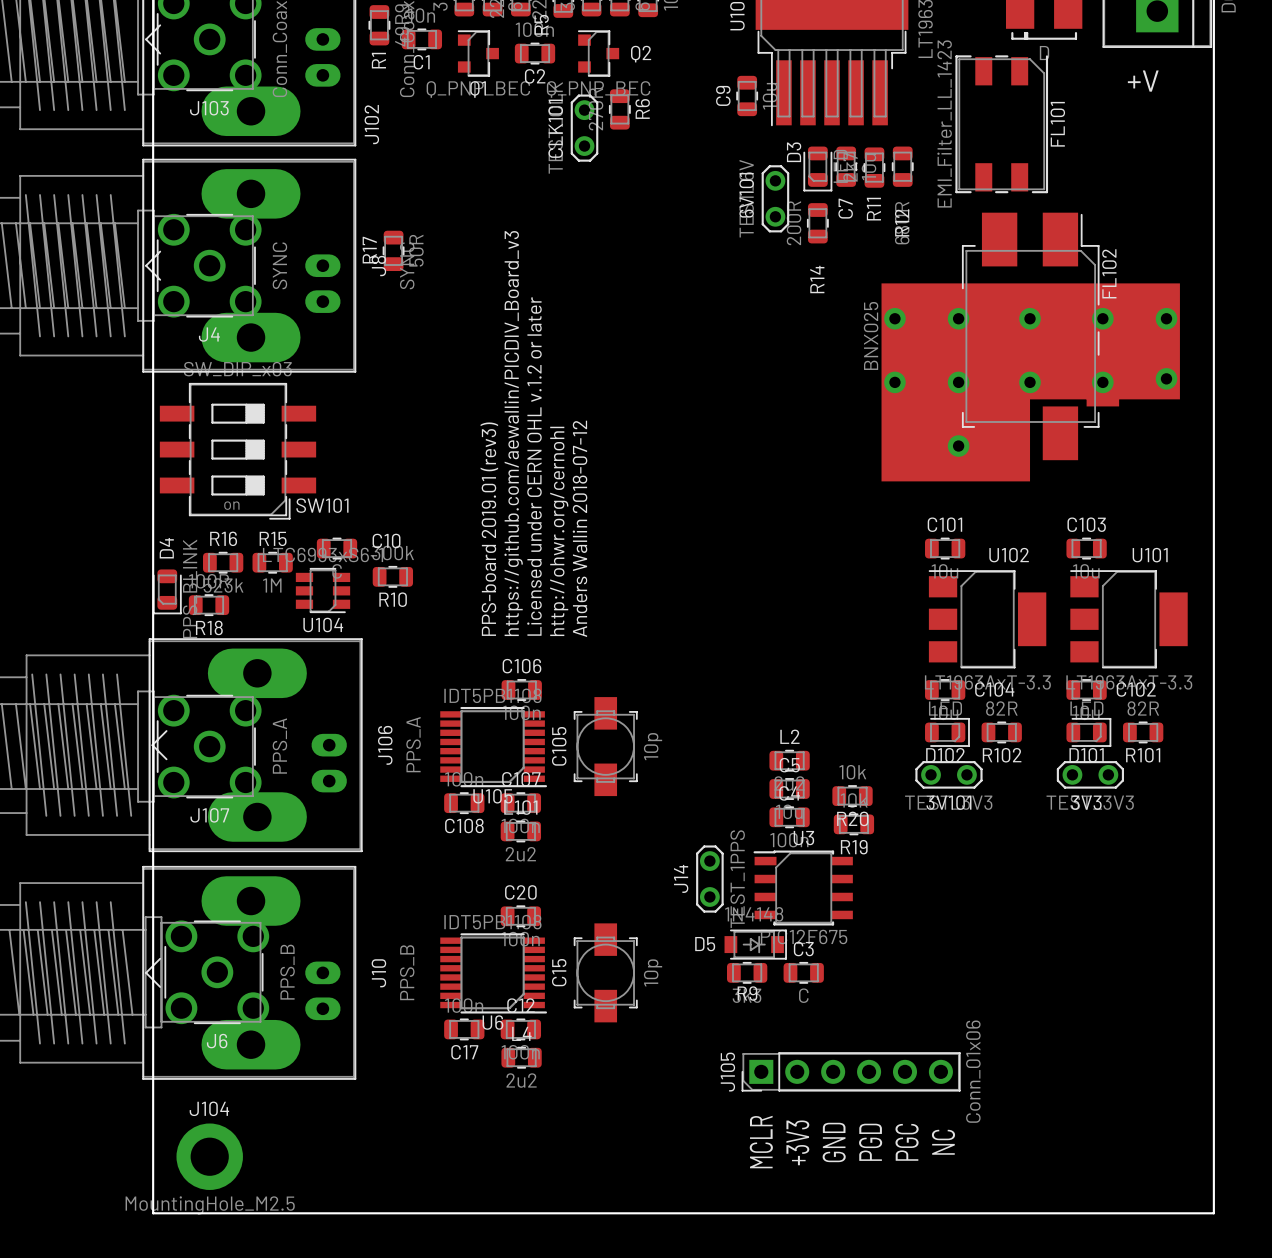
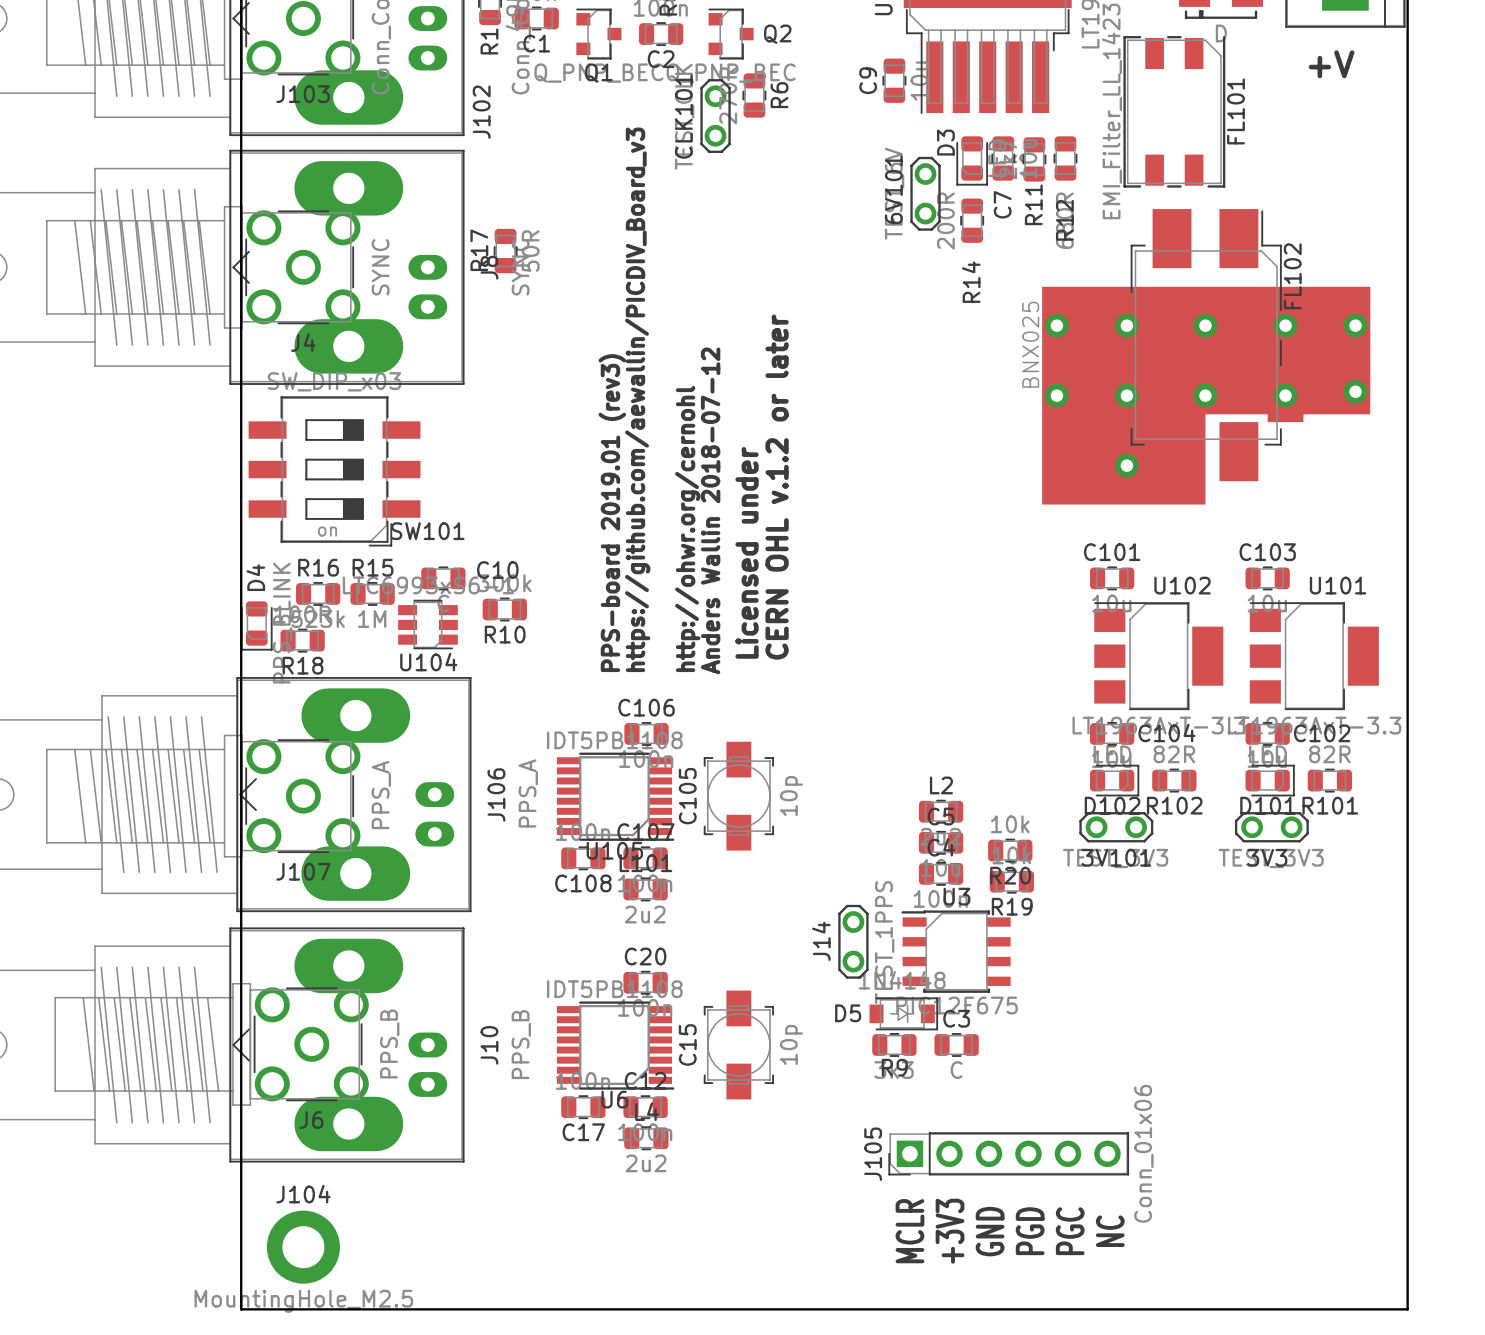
text: Licensed under CERN OHL v.1.2 or later (534, 466) -> none
text: none -> CERN OHL v.1.2 or later (777, 487)
text: none -> Licensed under (747, 552)

